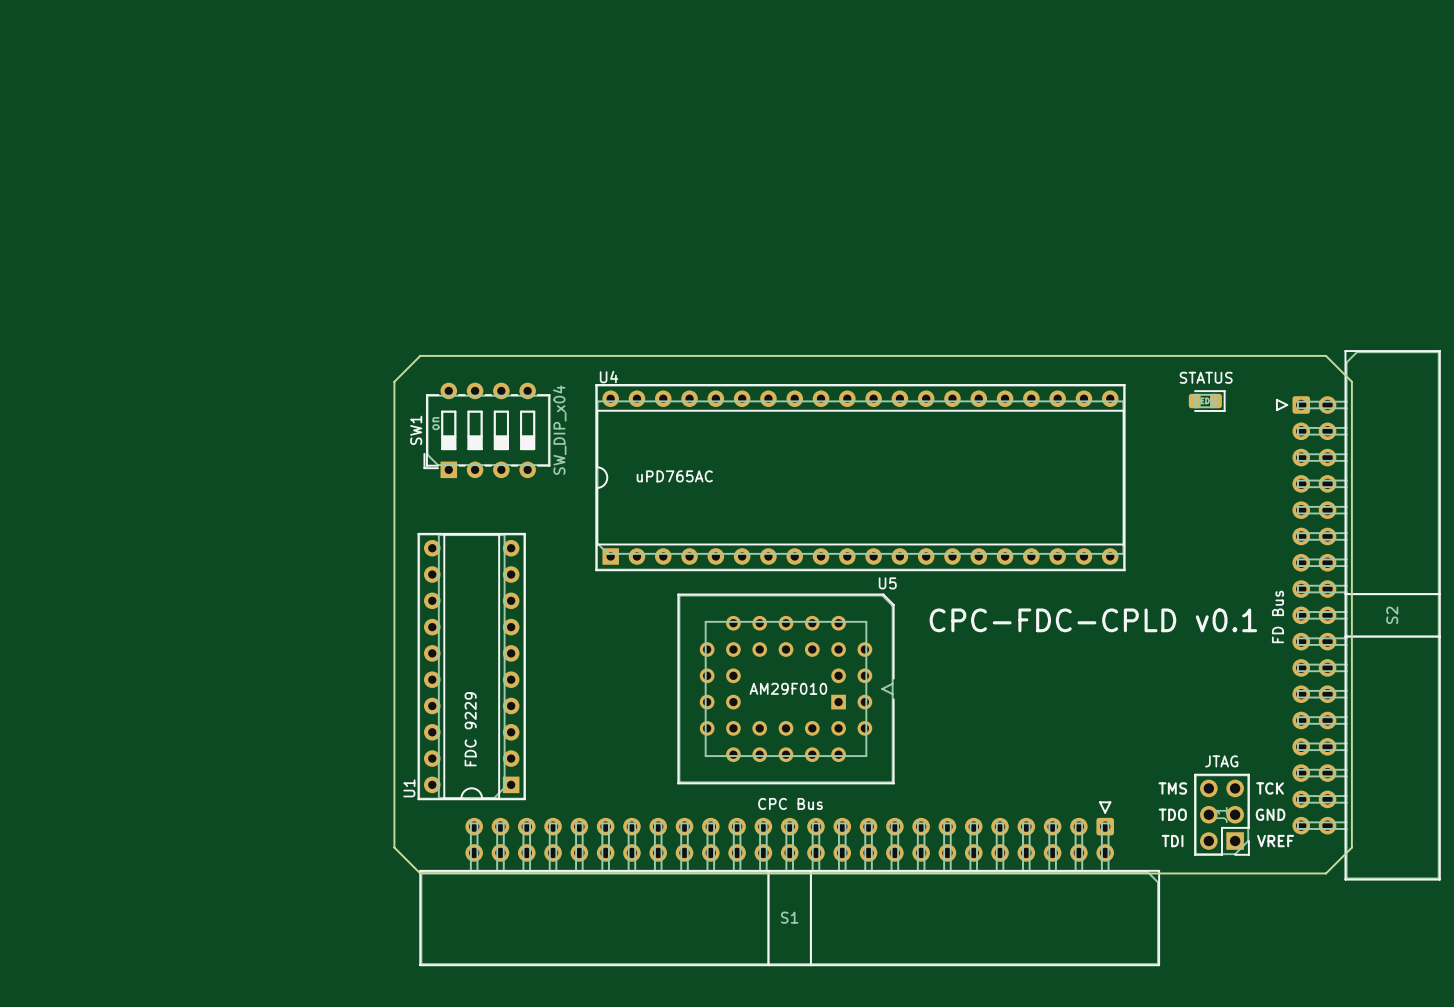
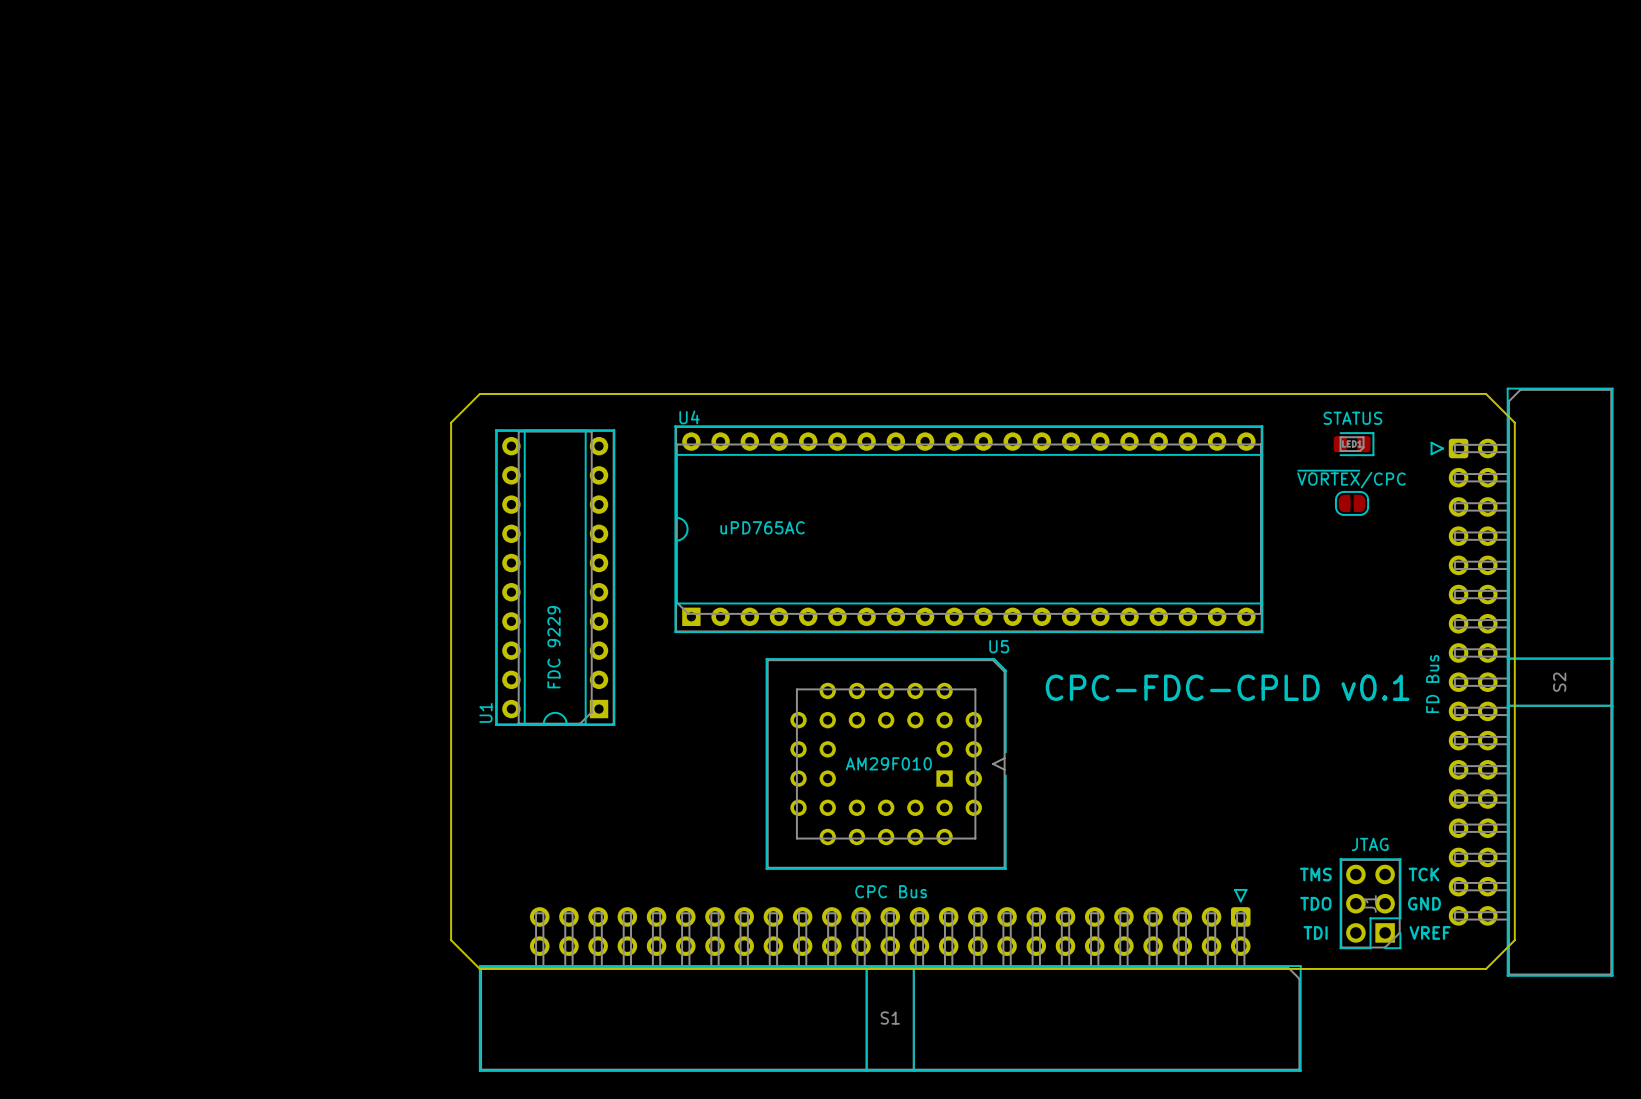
SW1: SW_DIP_x04 (486, 430) -> none
part: none -> ~{VORTEX}/CPC (1352, 503)
U1 position: (471, 666) -> (555, 577)

